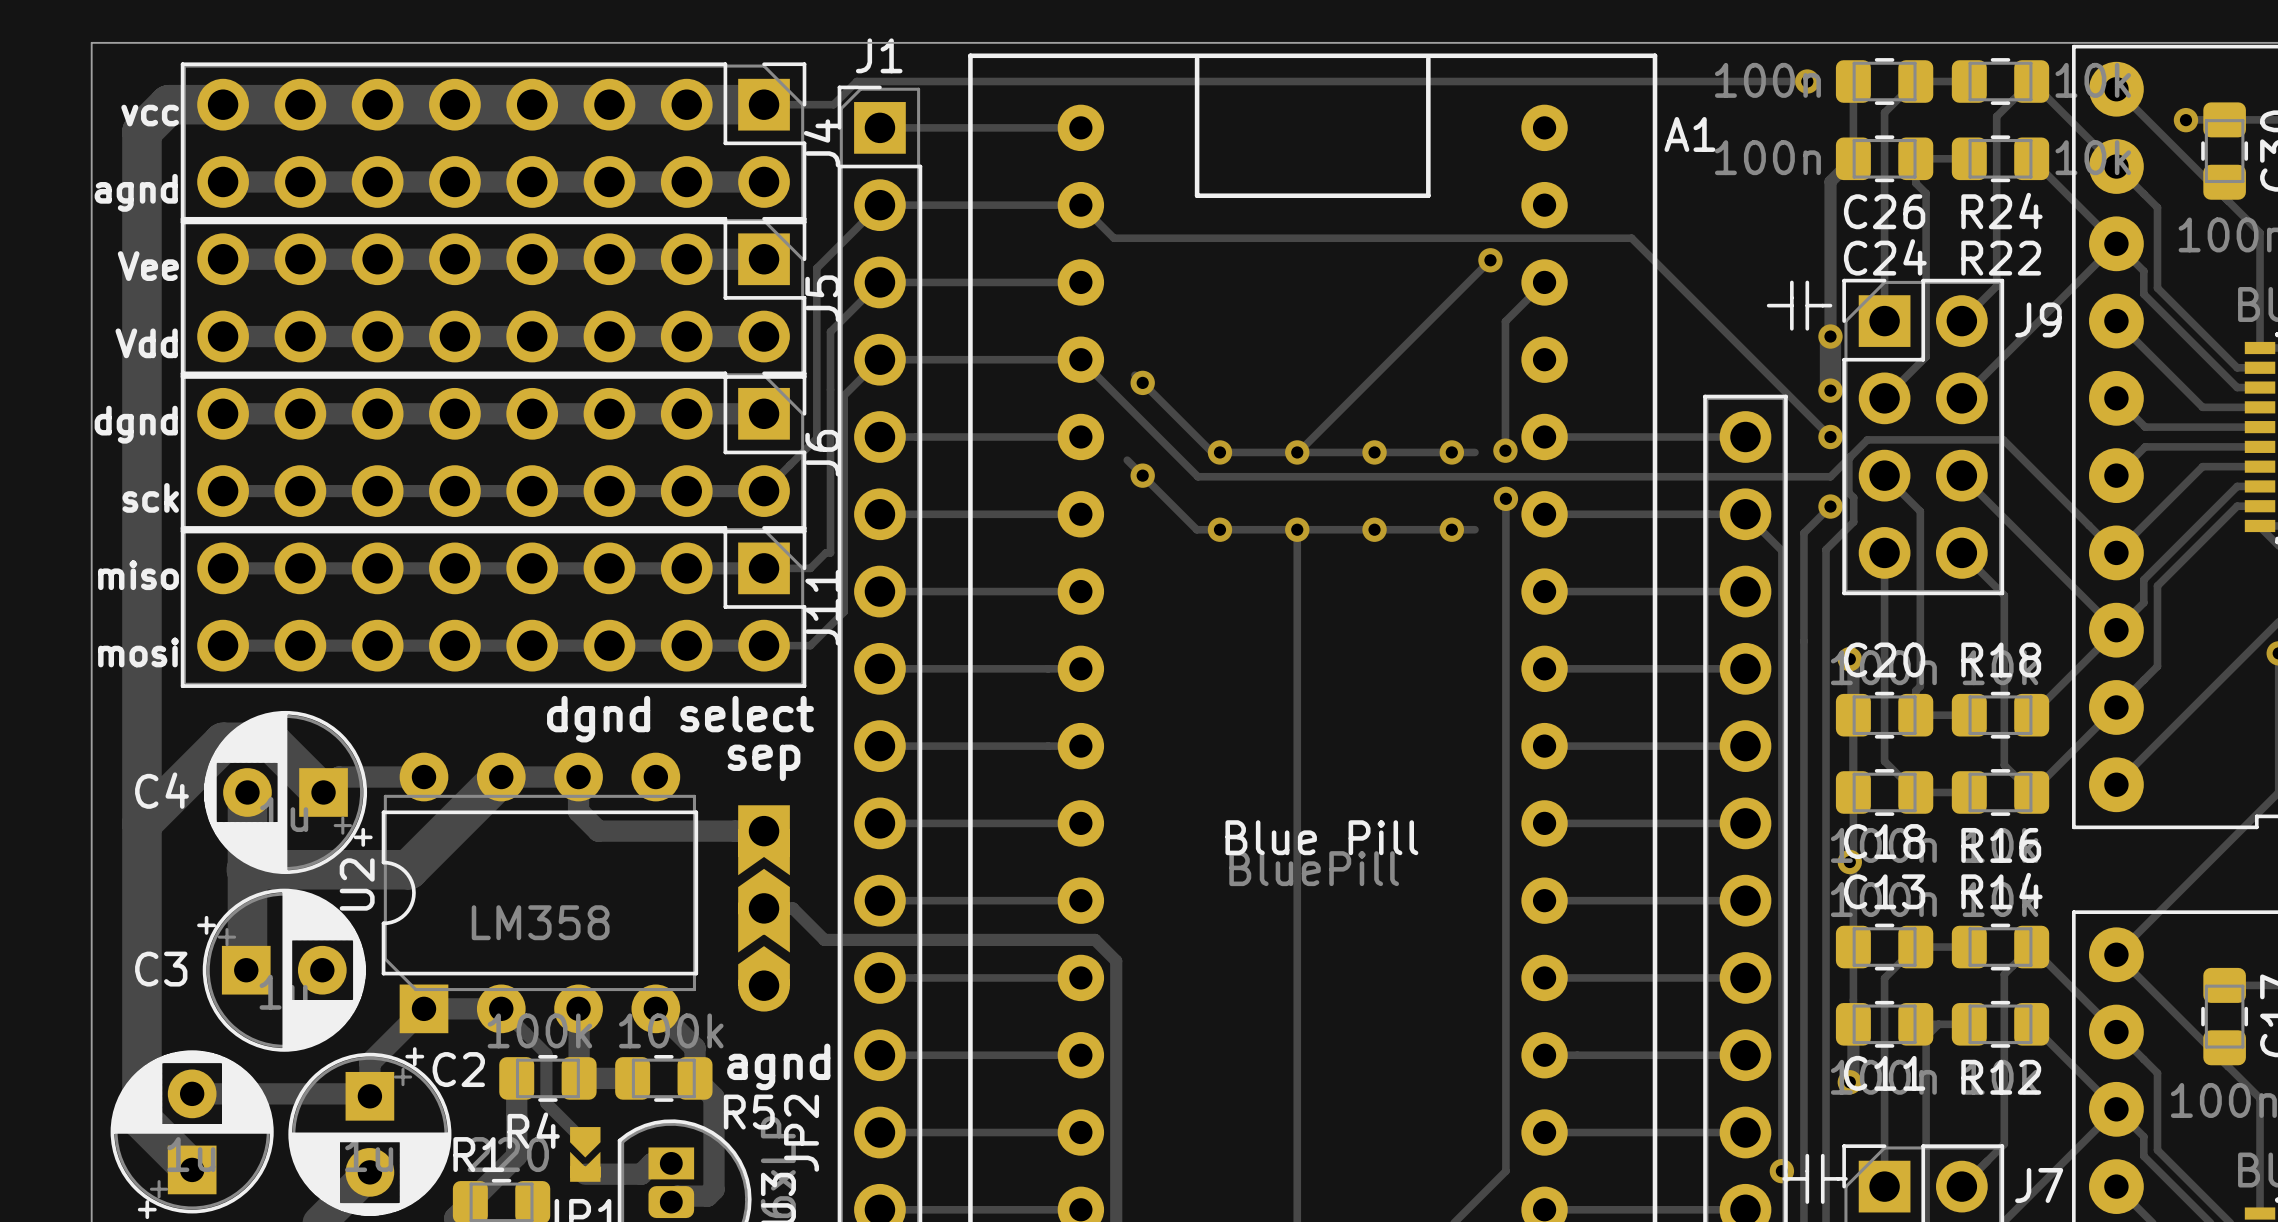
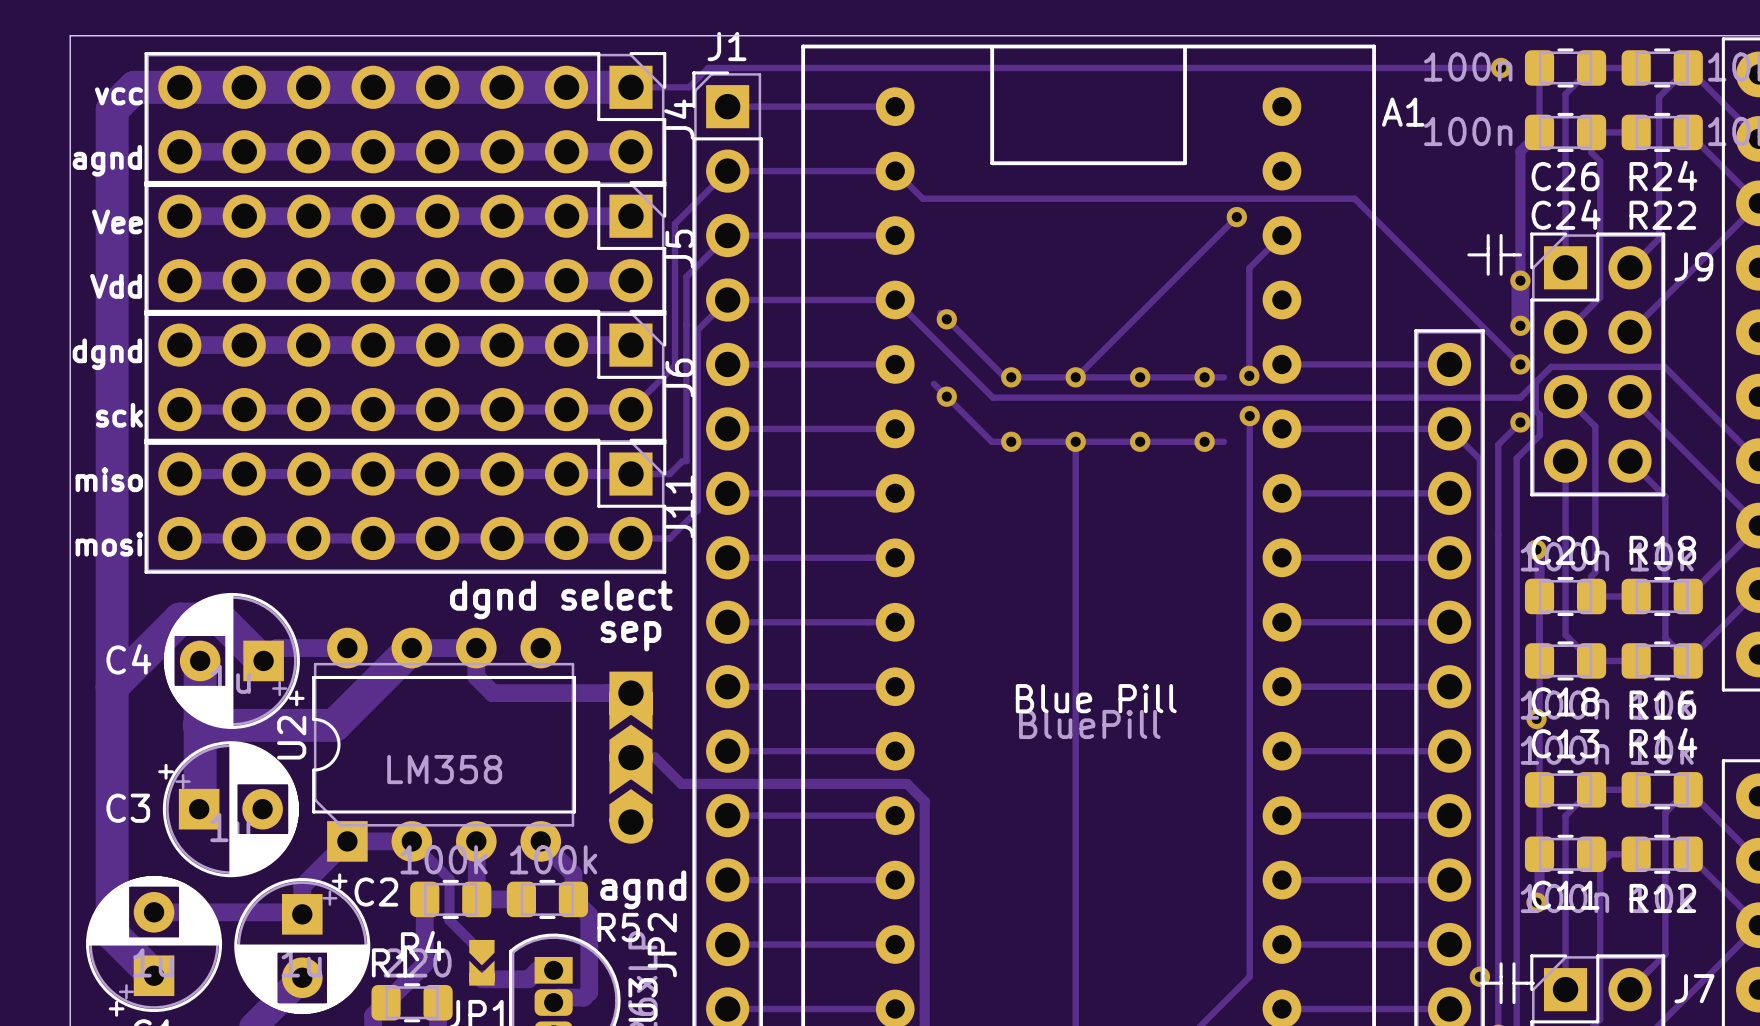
R4 name position: R4 (533, 1130) -> R4 (422, 946)

